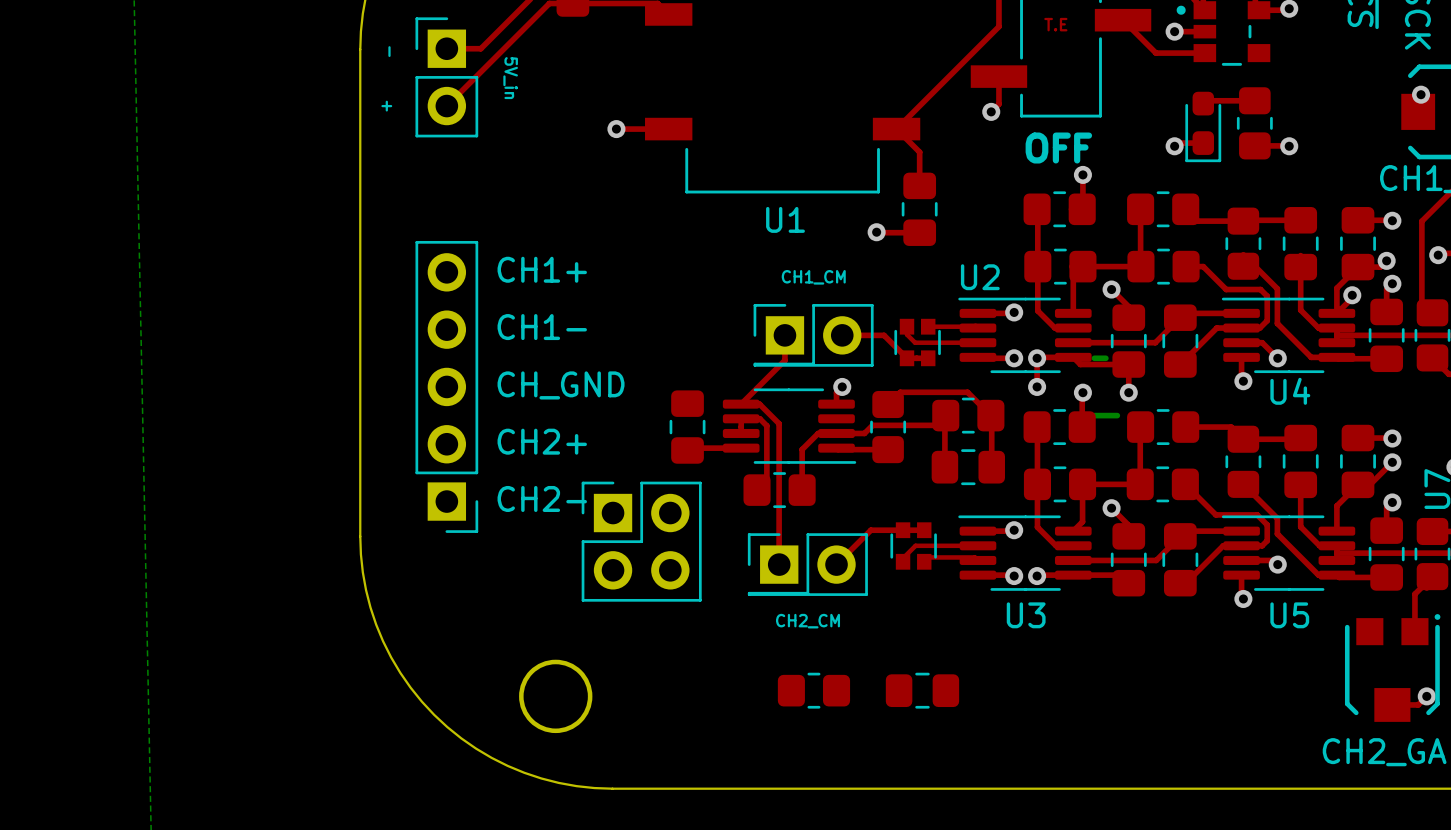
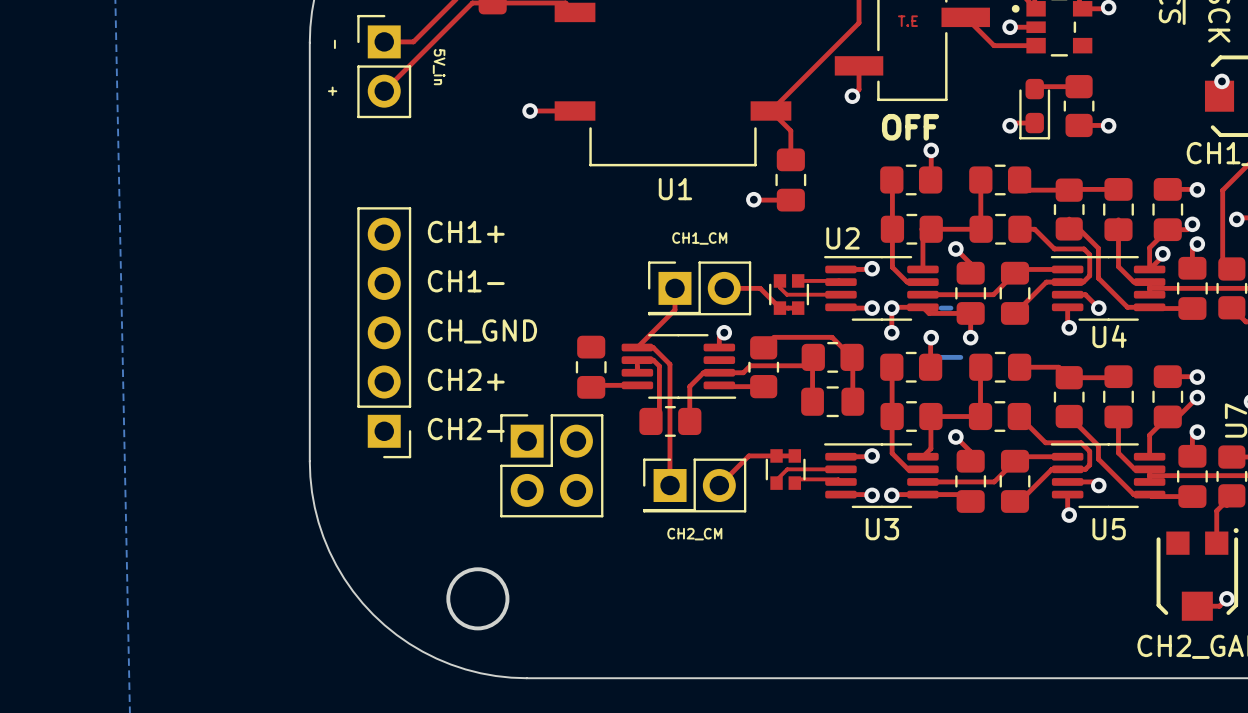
part: (813, 690) -> none
part: (922, 690) -> none

